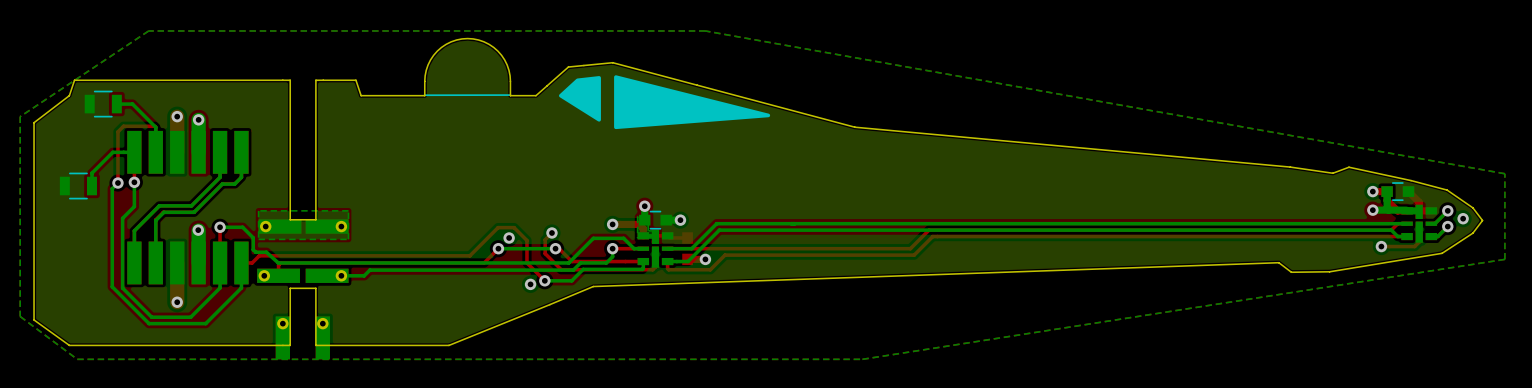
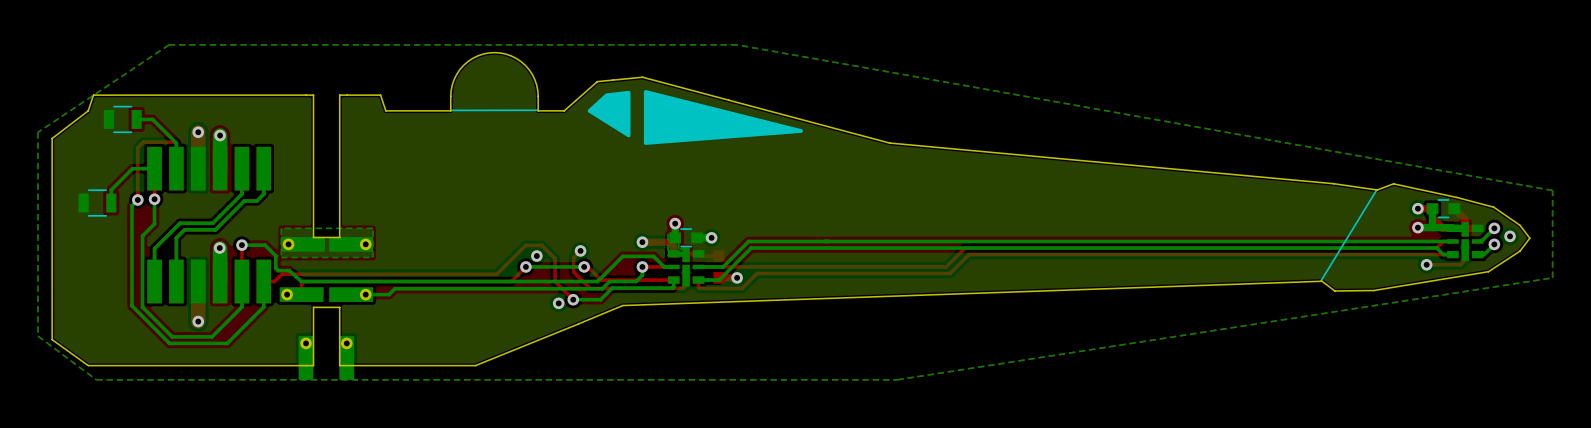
line: none -> (1376, 190) (1321, 280)

